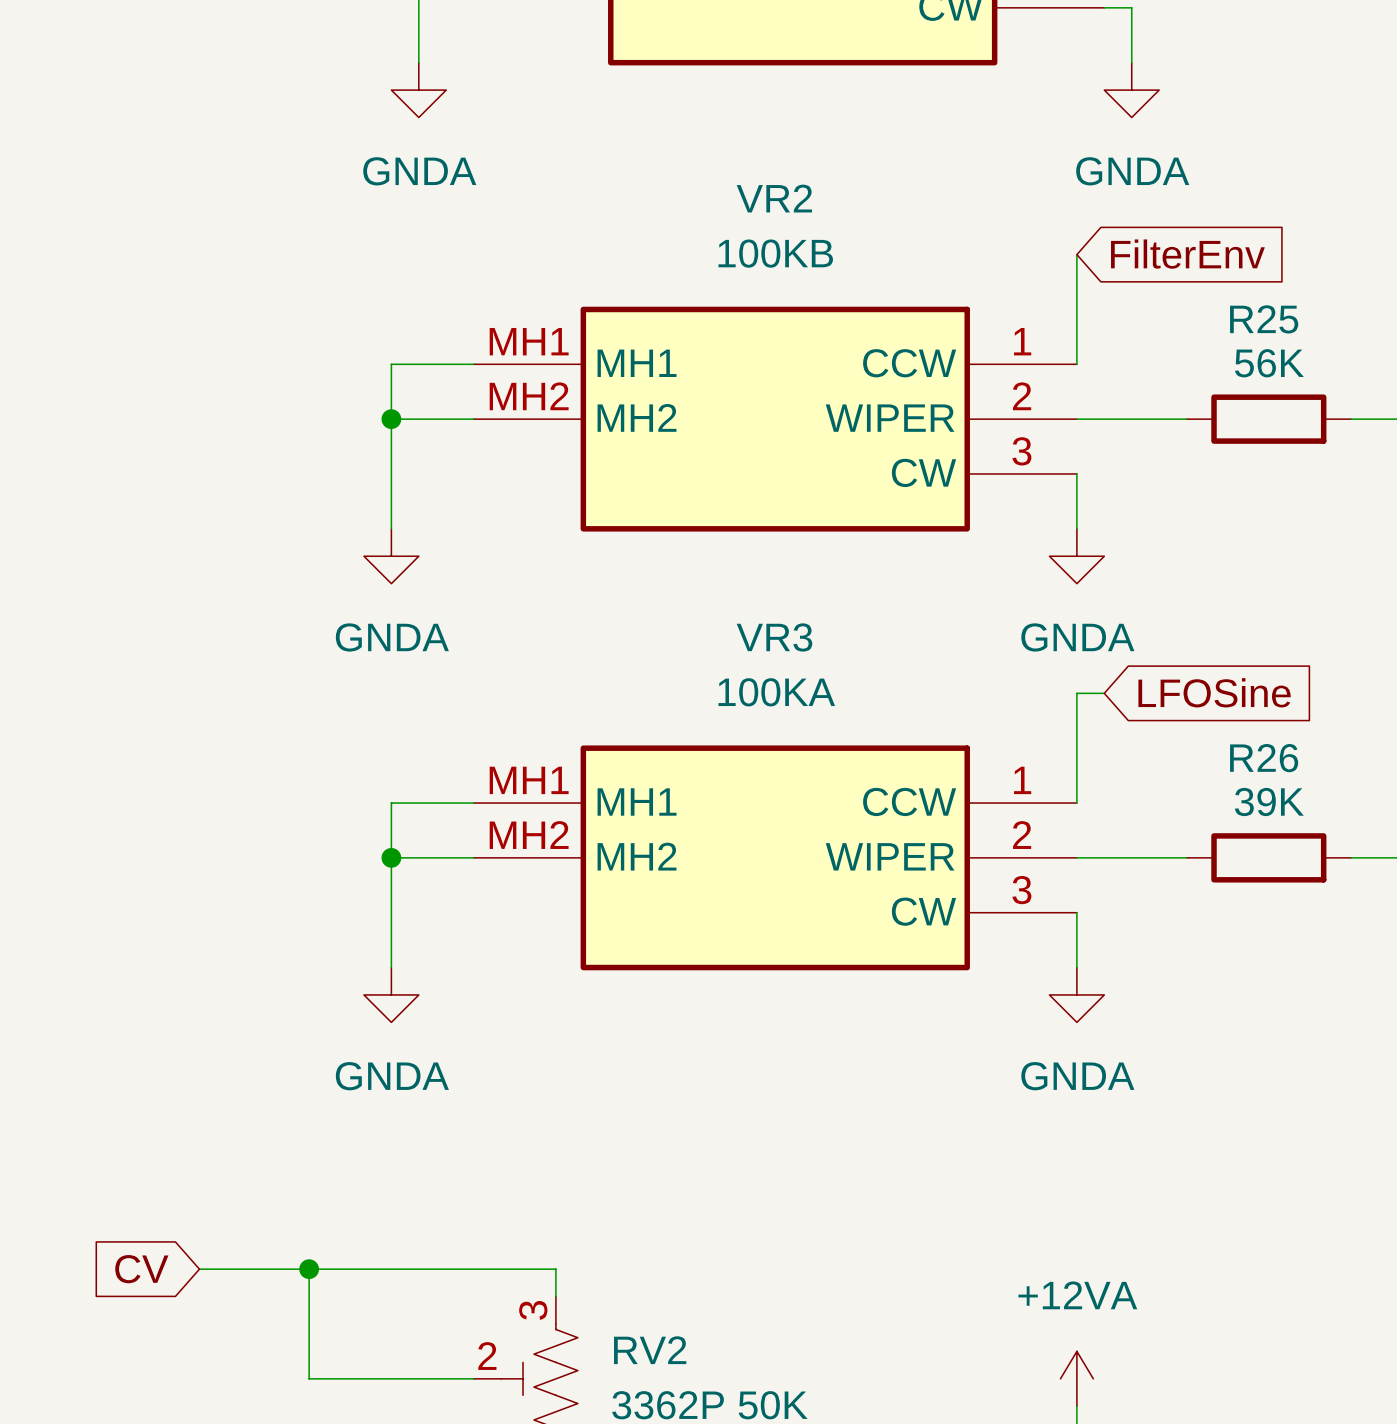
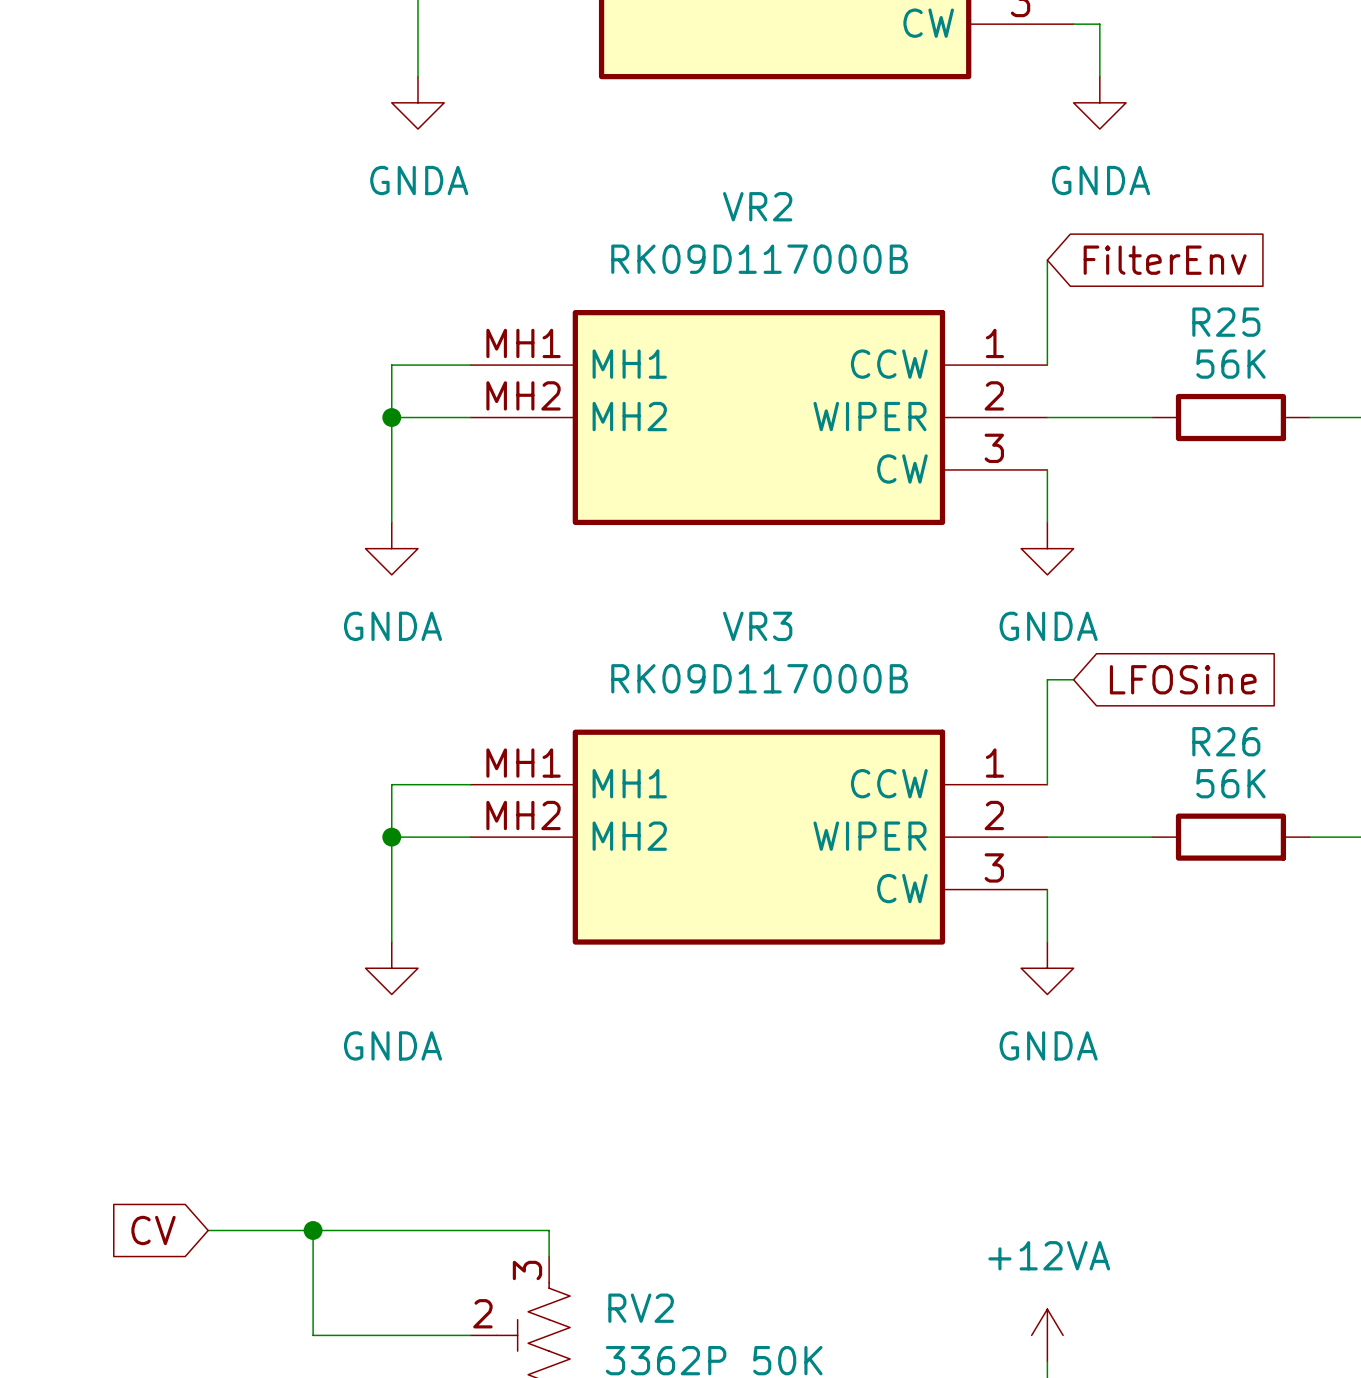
VR2 value: 100KB (775, 253) -> RK09D117000B (759, 259)
VR3 value: 100KA (776, 692) -> RK09D117000B (759, 678)
R26 value: 39K (1269, 801) -> 56K (1230, 783)

